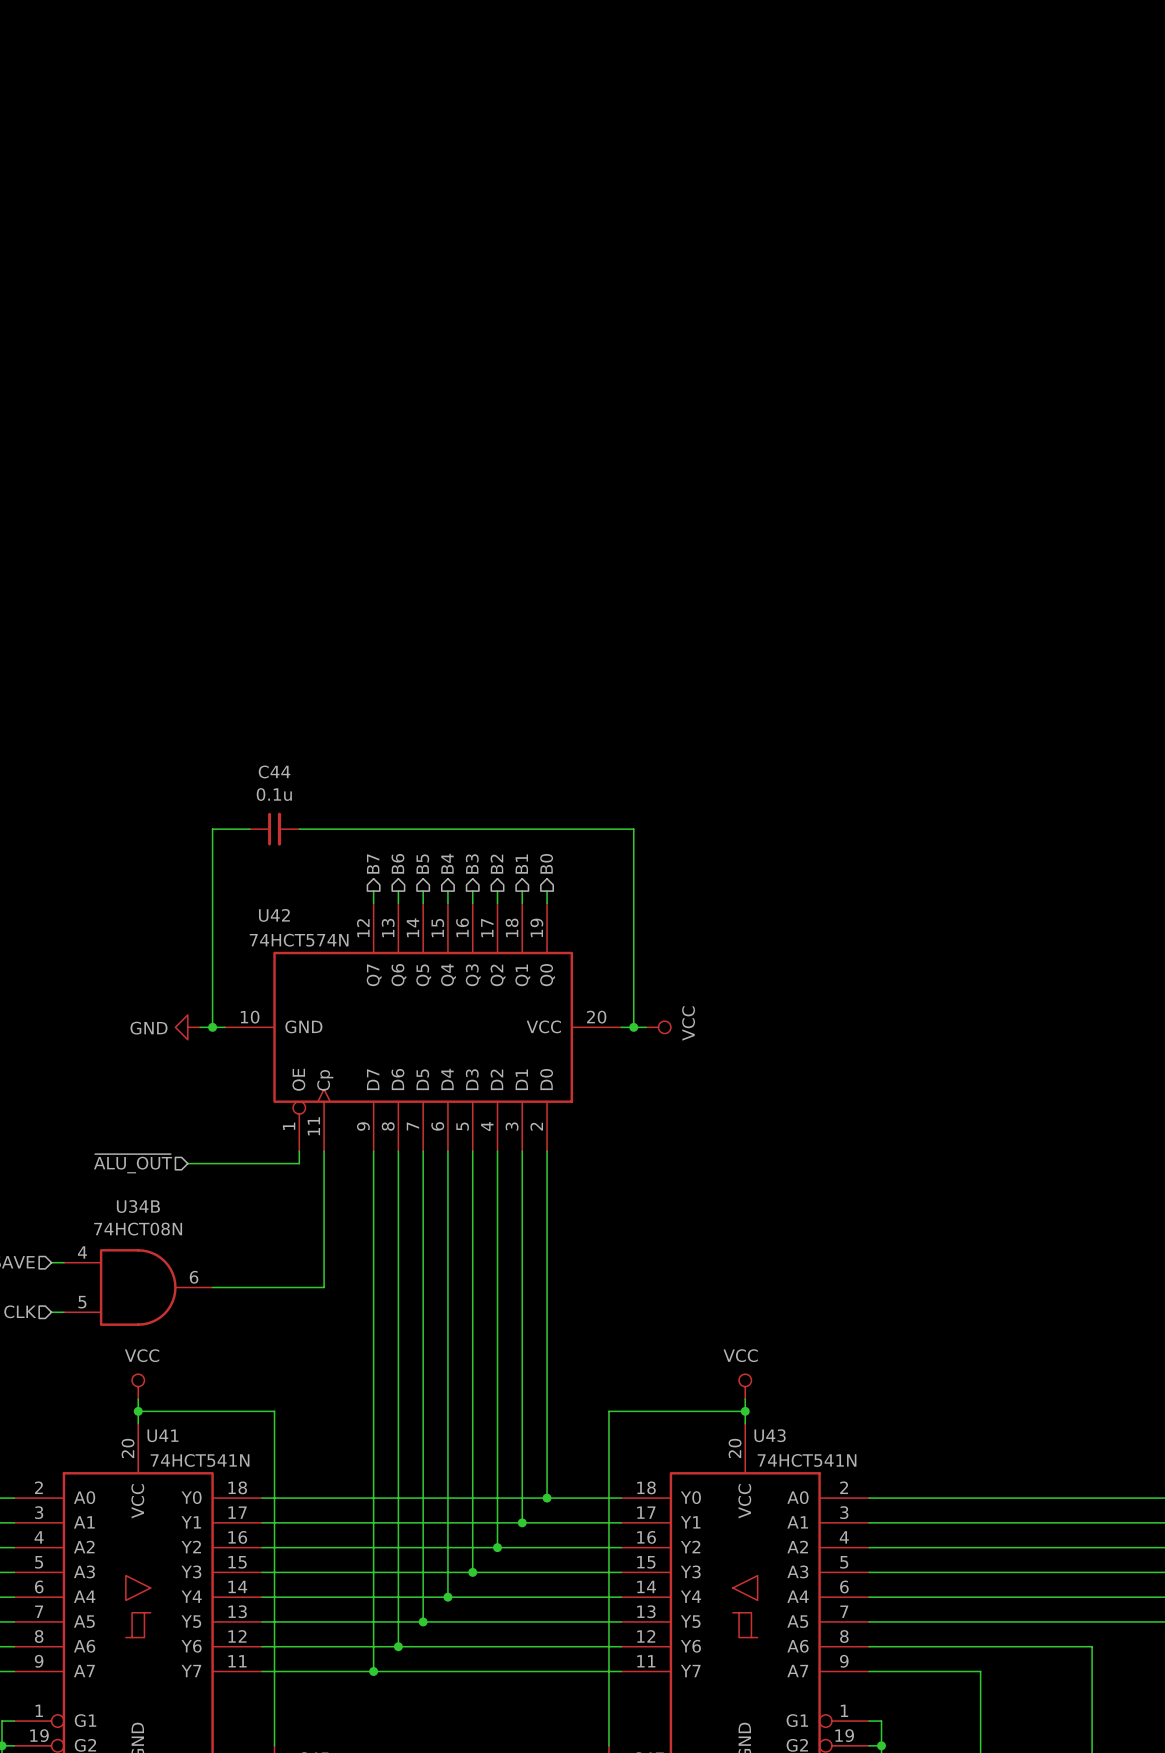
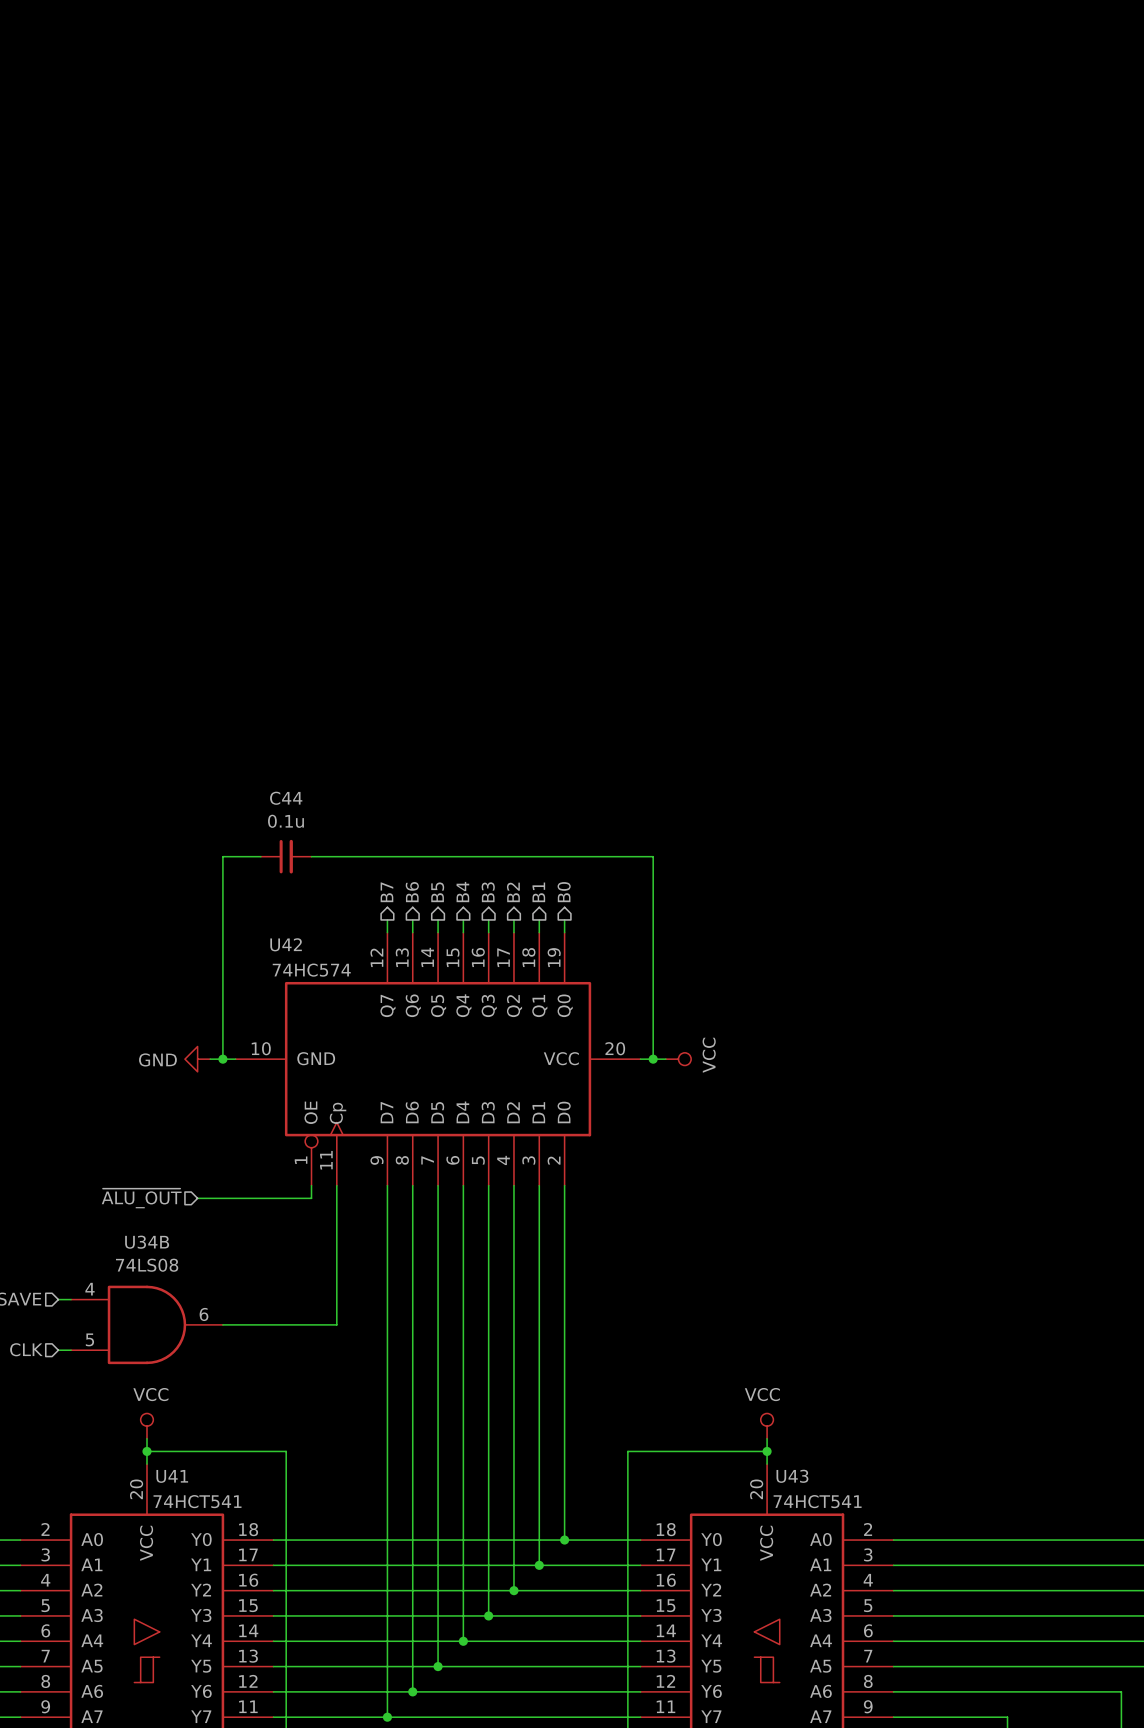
U42 value: 74HCT574N (299, 940) -> 74HC574 (311, 970)
U34B value: 74HCT08N (138, 1229) -> 74LS08 (147, 1265)
U41 value: 74HCT541N (200, 1460) -> 74HCT541 (197, 1501)
U43 value: 74HCT541N (807, 1460) -> 74HCT541 (817, 1501)

